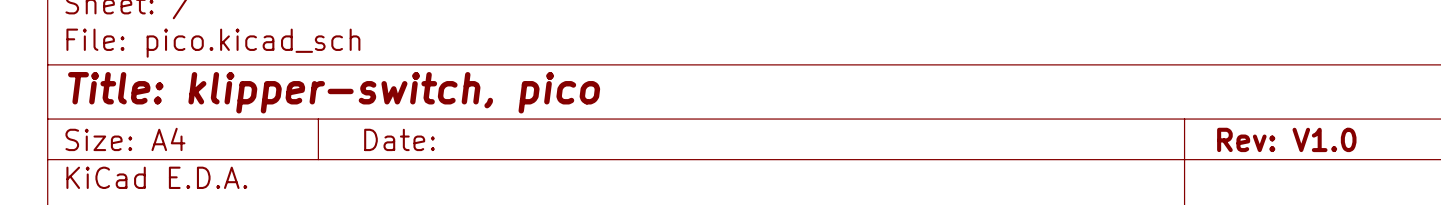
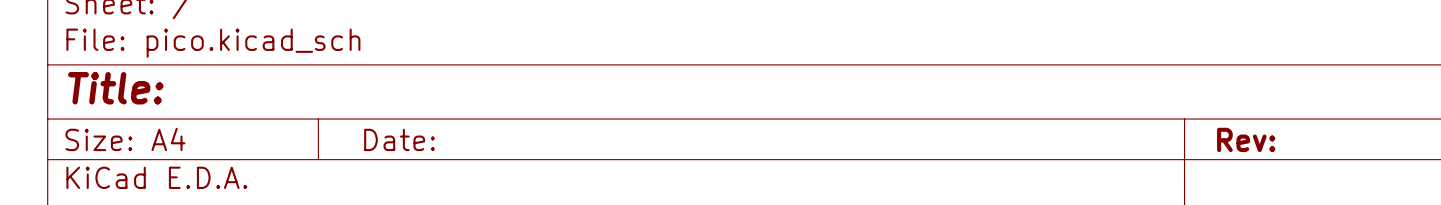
title block: Title: klipper-switch, pico (334, 92) -> Title: (115, 88)
title block: Rev: V1.0 (1286, 139) -> Rev: (1246, 139)

